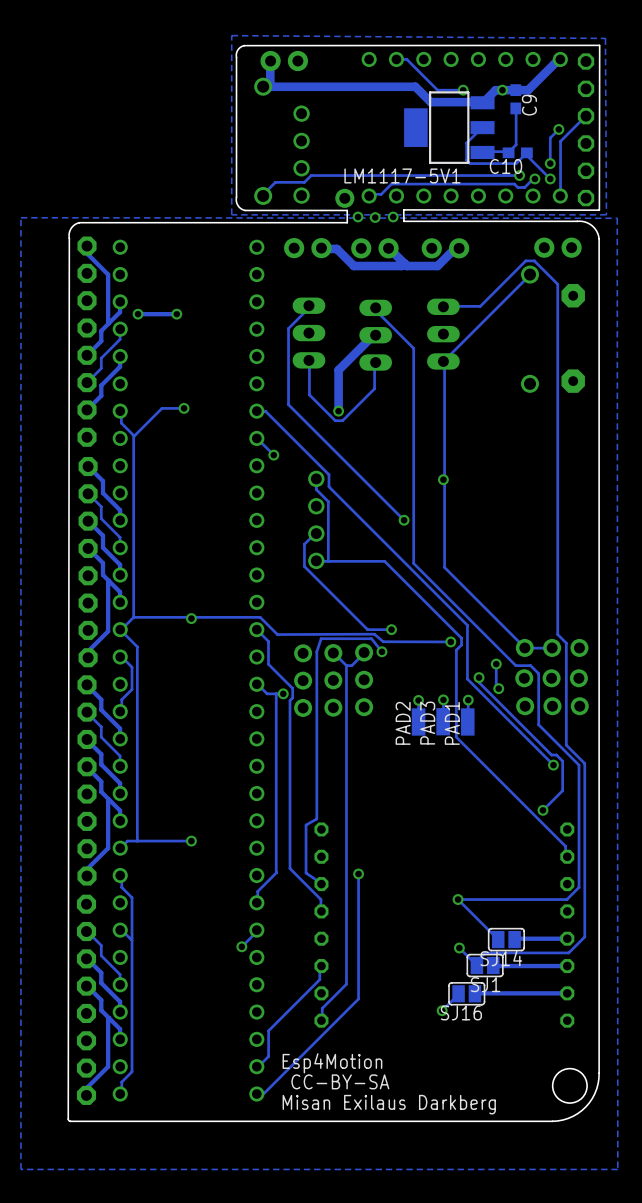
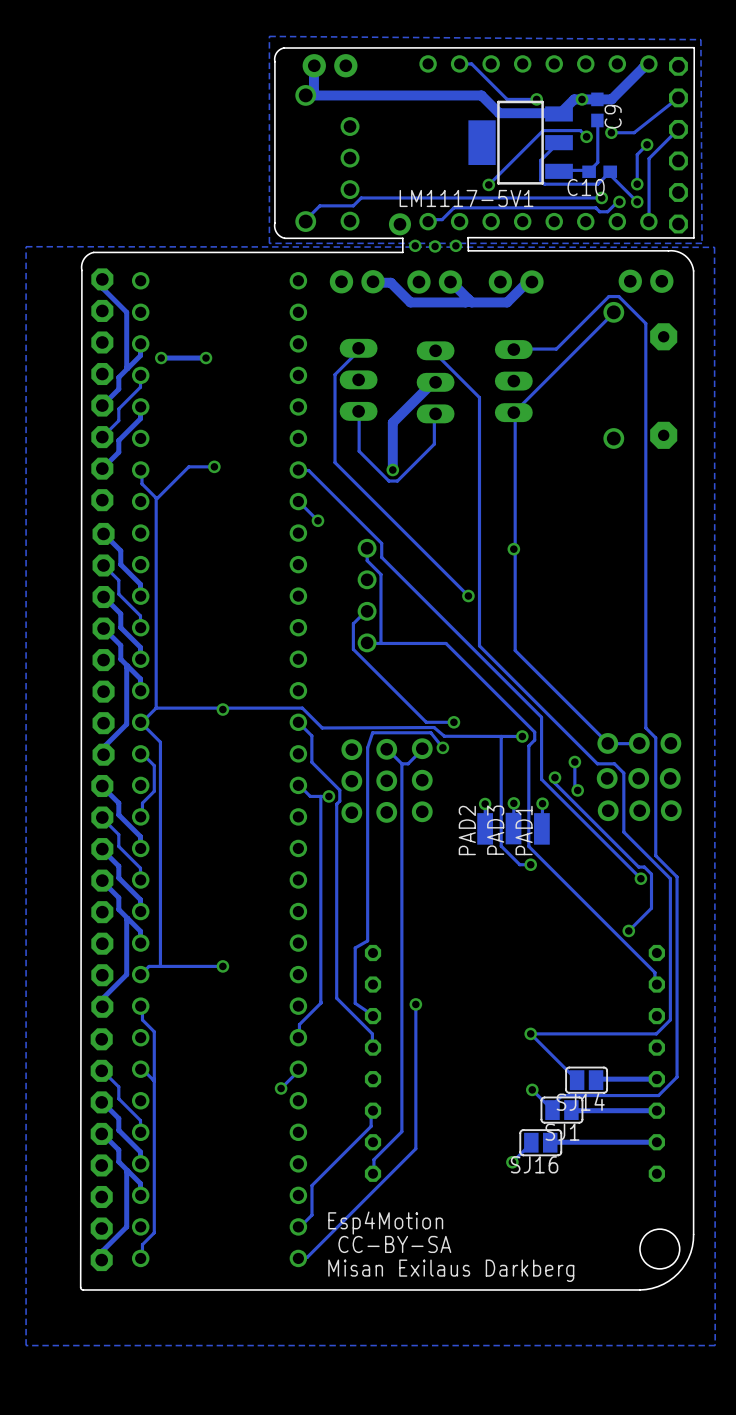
track: none -> (678, 97) (634, 132) (611, 132)
via: none -> (611, 132)
track: none -> (586, 136) (580, 130) (543, 130) (488, 184)
via: none -> (586, 136)
via: none -> (488, 184)
track: none -> (501, 736) (501, 846) (519, 864) (530, 864)
via: none -> (530, 864)

